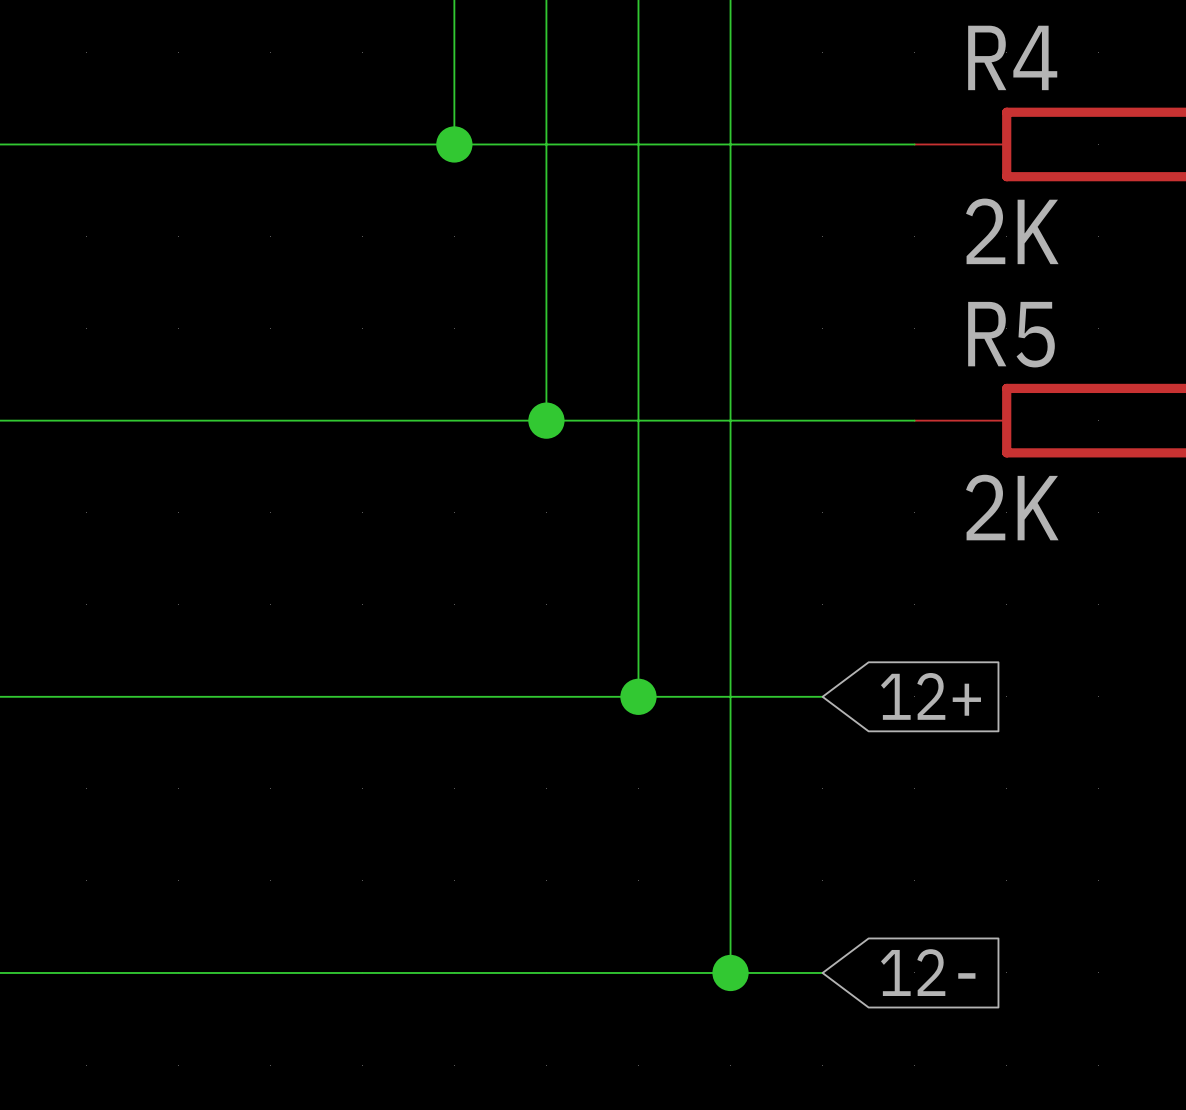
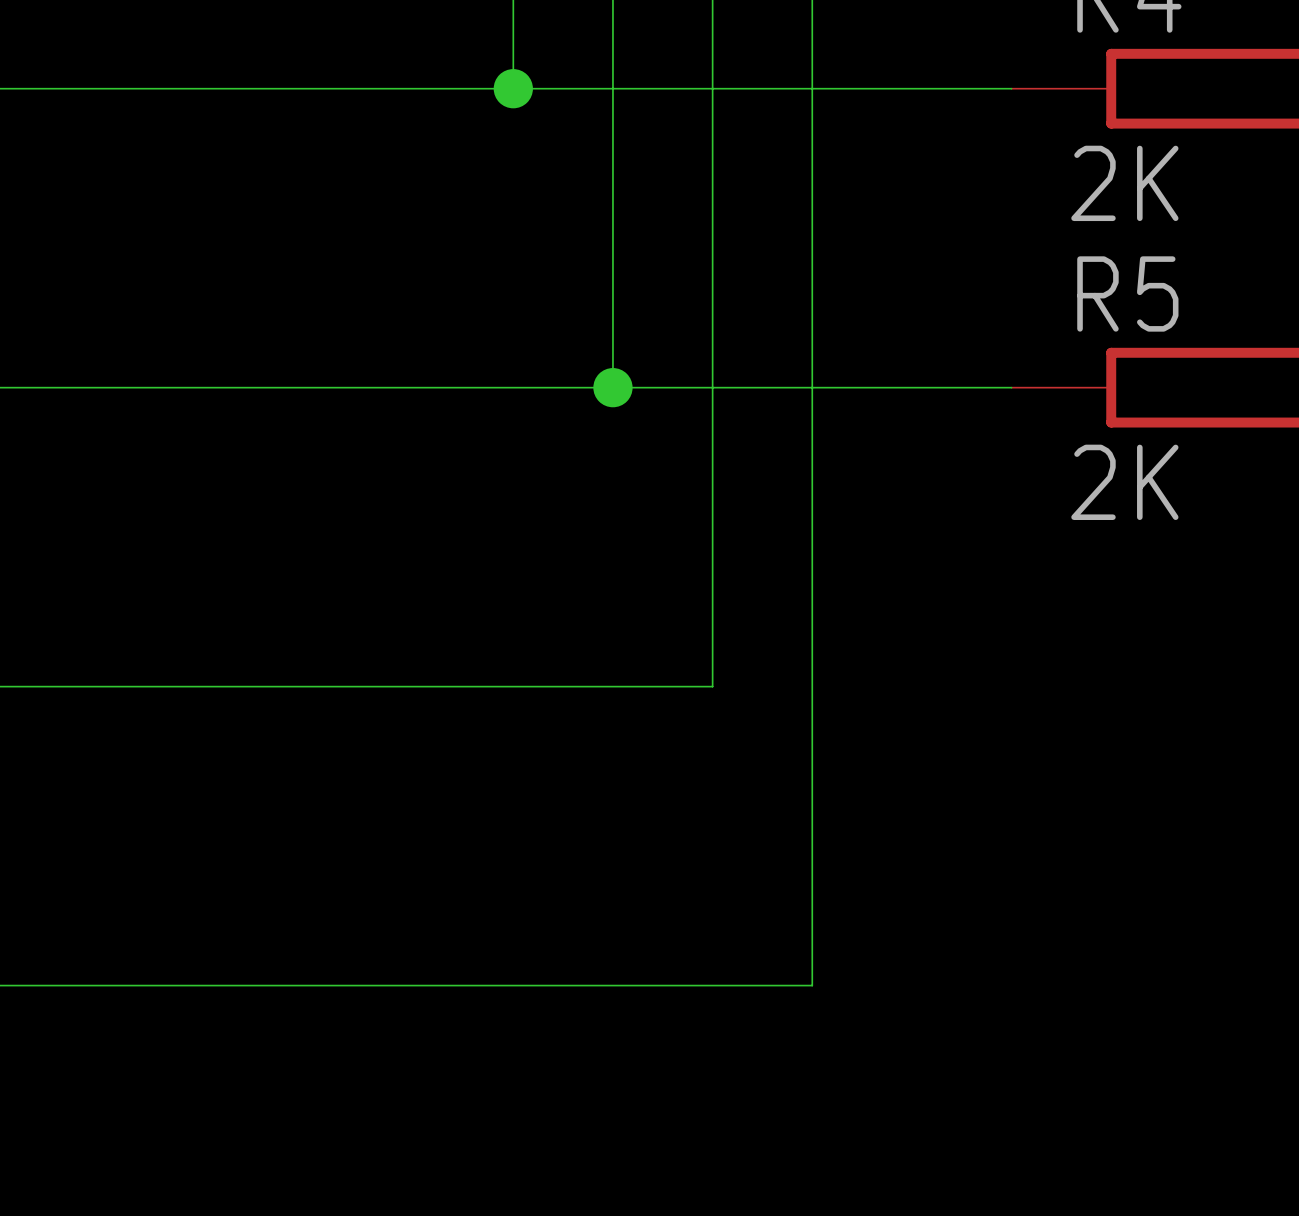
wire: (638, 696) (822, 696) -> none
junction: (638, 696) -> none
global label: 12+ (930, 696) -> none
wire: (730, 972) (822, 972) -> none
junction: (730, 972) -> none
global label: 12- (928, 972) -> none

